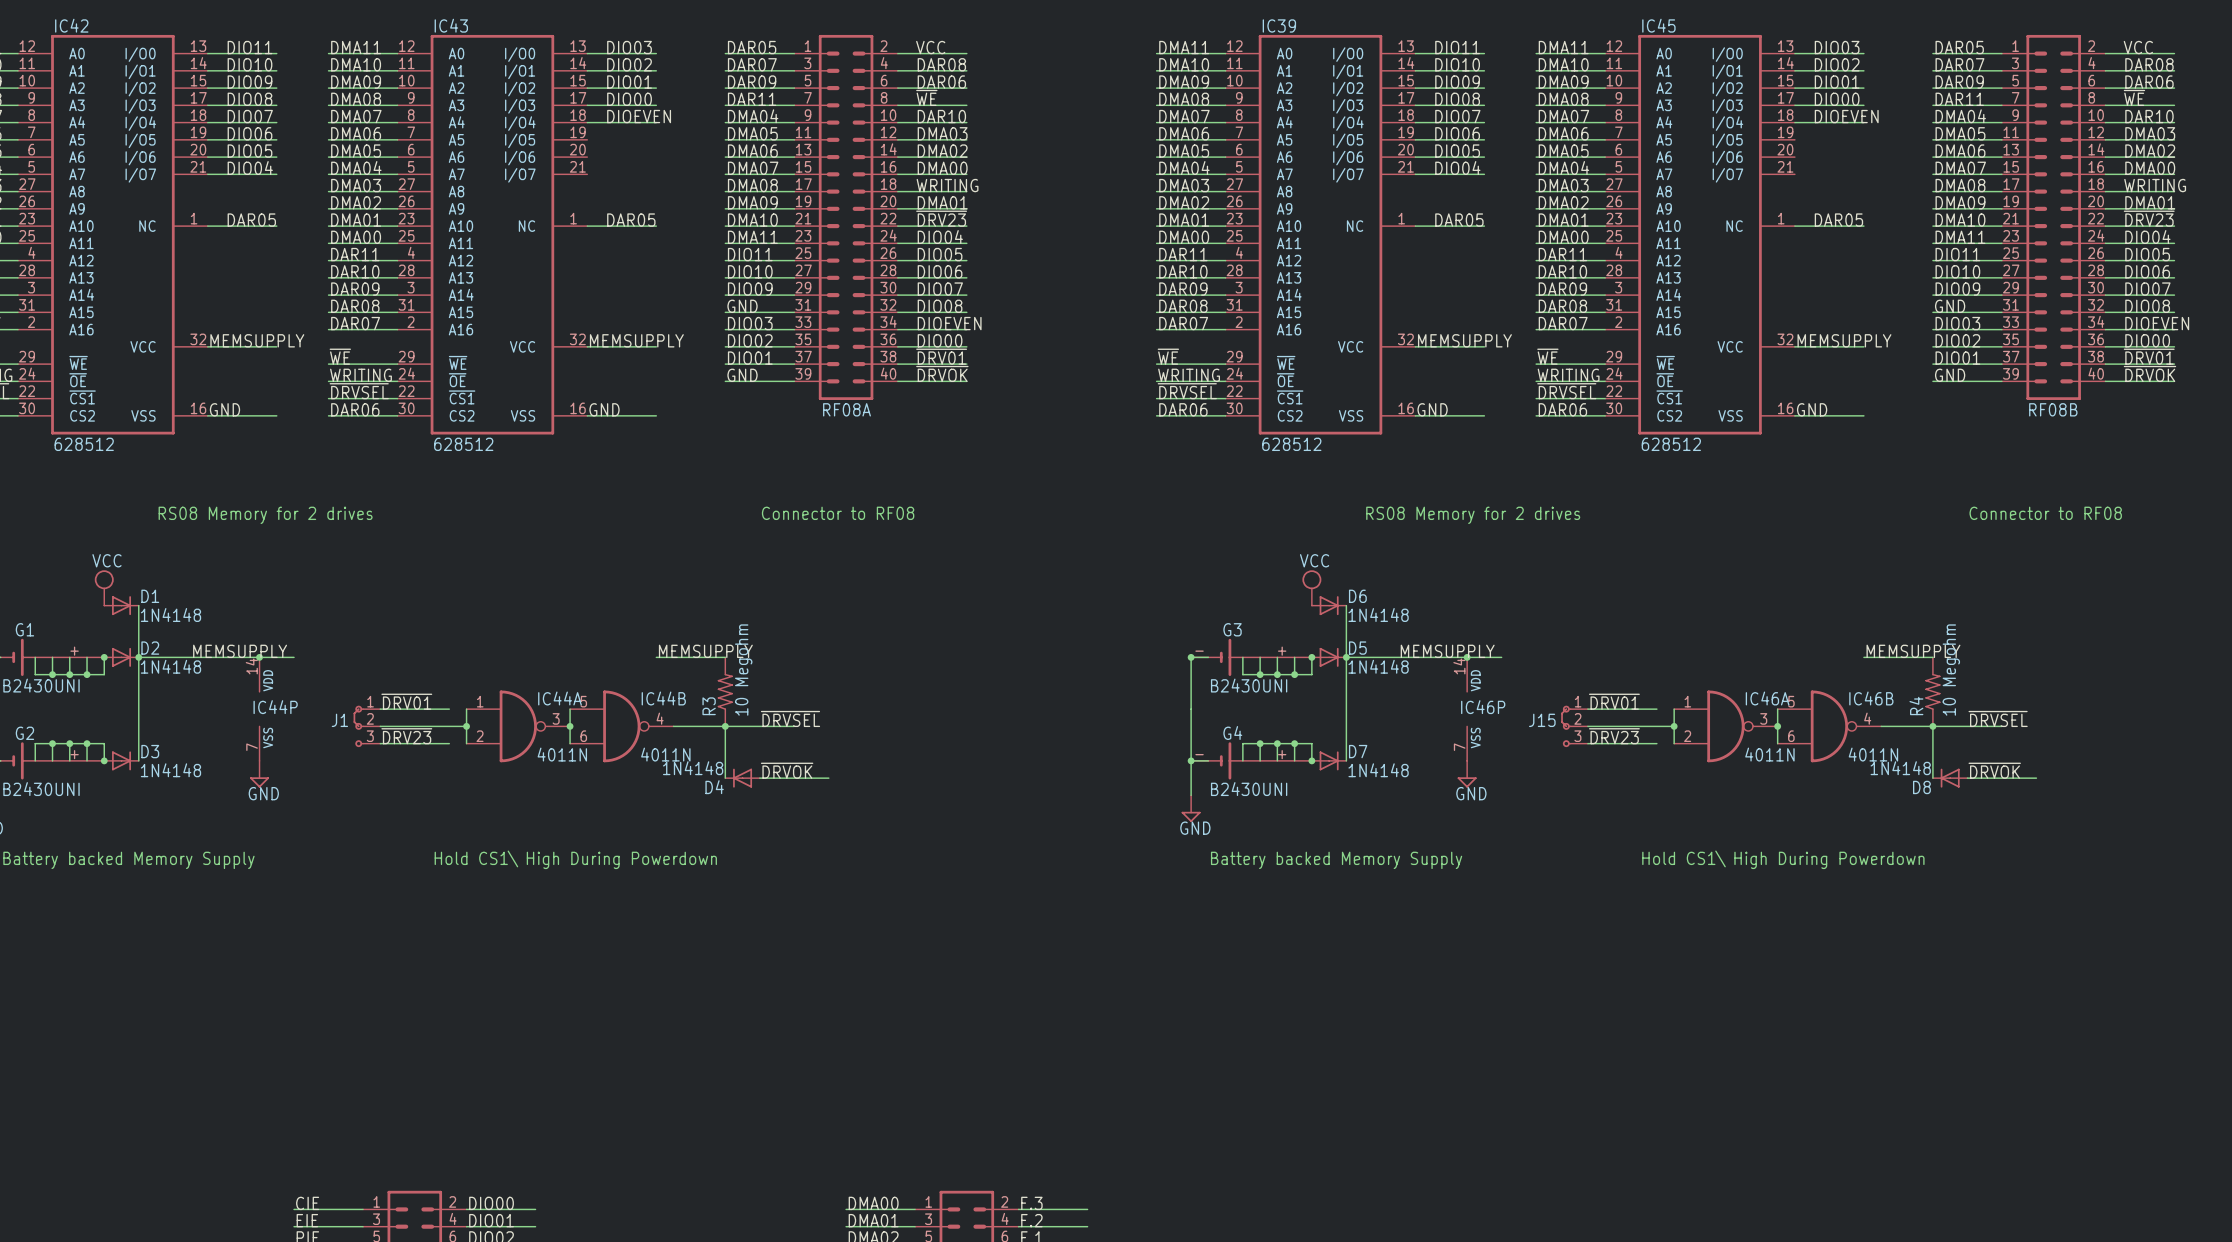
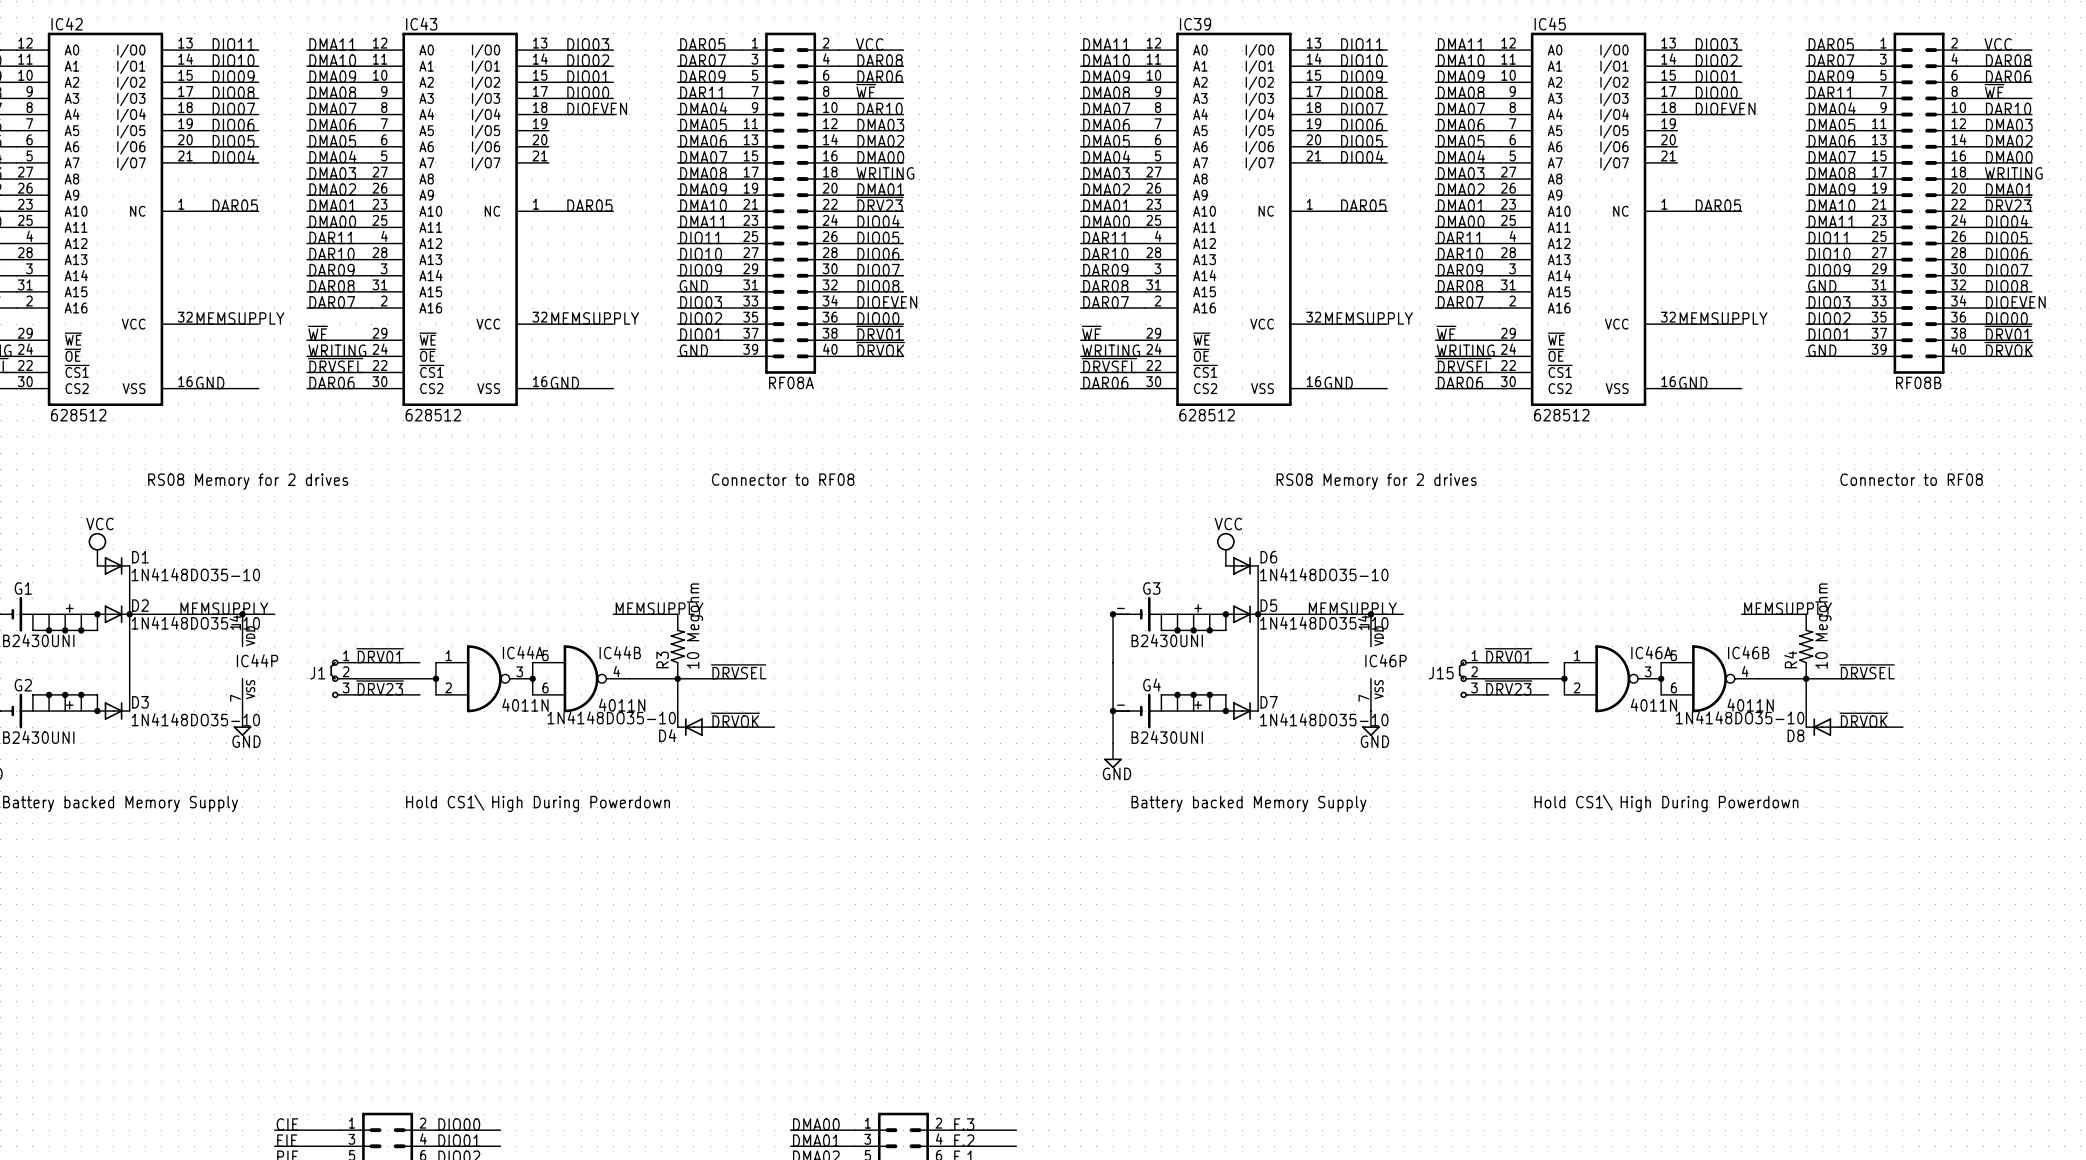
D1 value: 1N4148 (170, 615) -> 1N4148DO35-10 (195, 574)
D6 value: 1N4148 (1378, 615) -> 1N4148DO35-10 (1324, 574)
D2 value: 1N4148 (170, 666) -> 1N4148DO35-10 (195, 623)
D5 value: 1N4148 (1378, 666) -> 1N4148DO35-10 (1324, 623)
D4 value: 1N4148 (693, 768) -> 1N4148DO35-10 (611, 717)
D8 value: 1N4148 (1900, 768) -> 1N4148DO35-10 (1740, 717)
D3 value: 1N4148 (170, 770) -> 1N4148DO35-10 (195, 719)
D7 value: 1N4148 (1378, 770) -> 1N4148DO35-10 (1324, 719)

